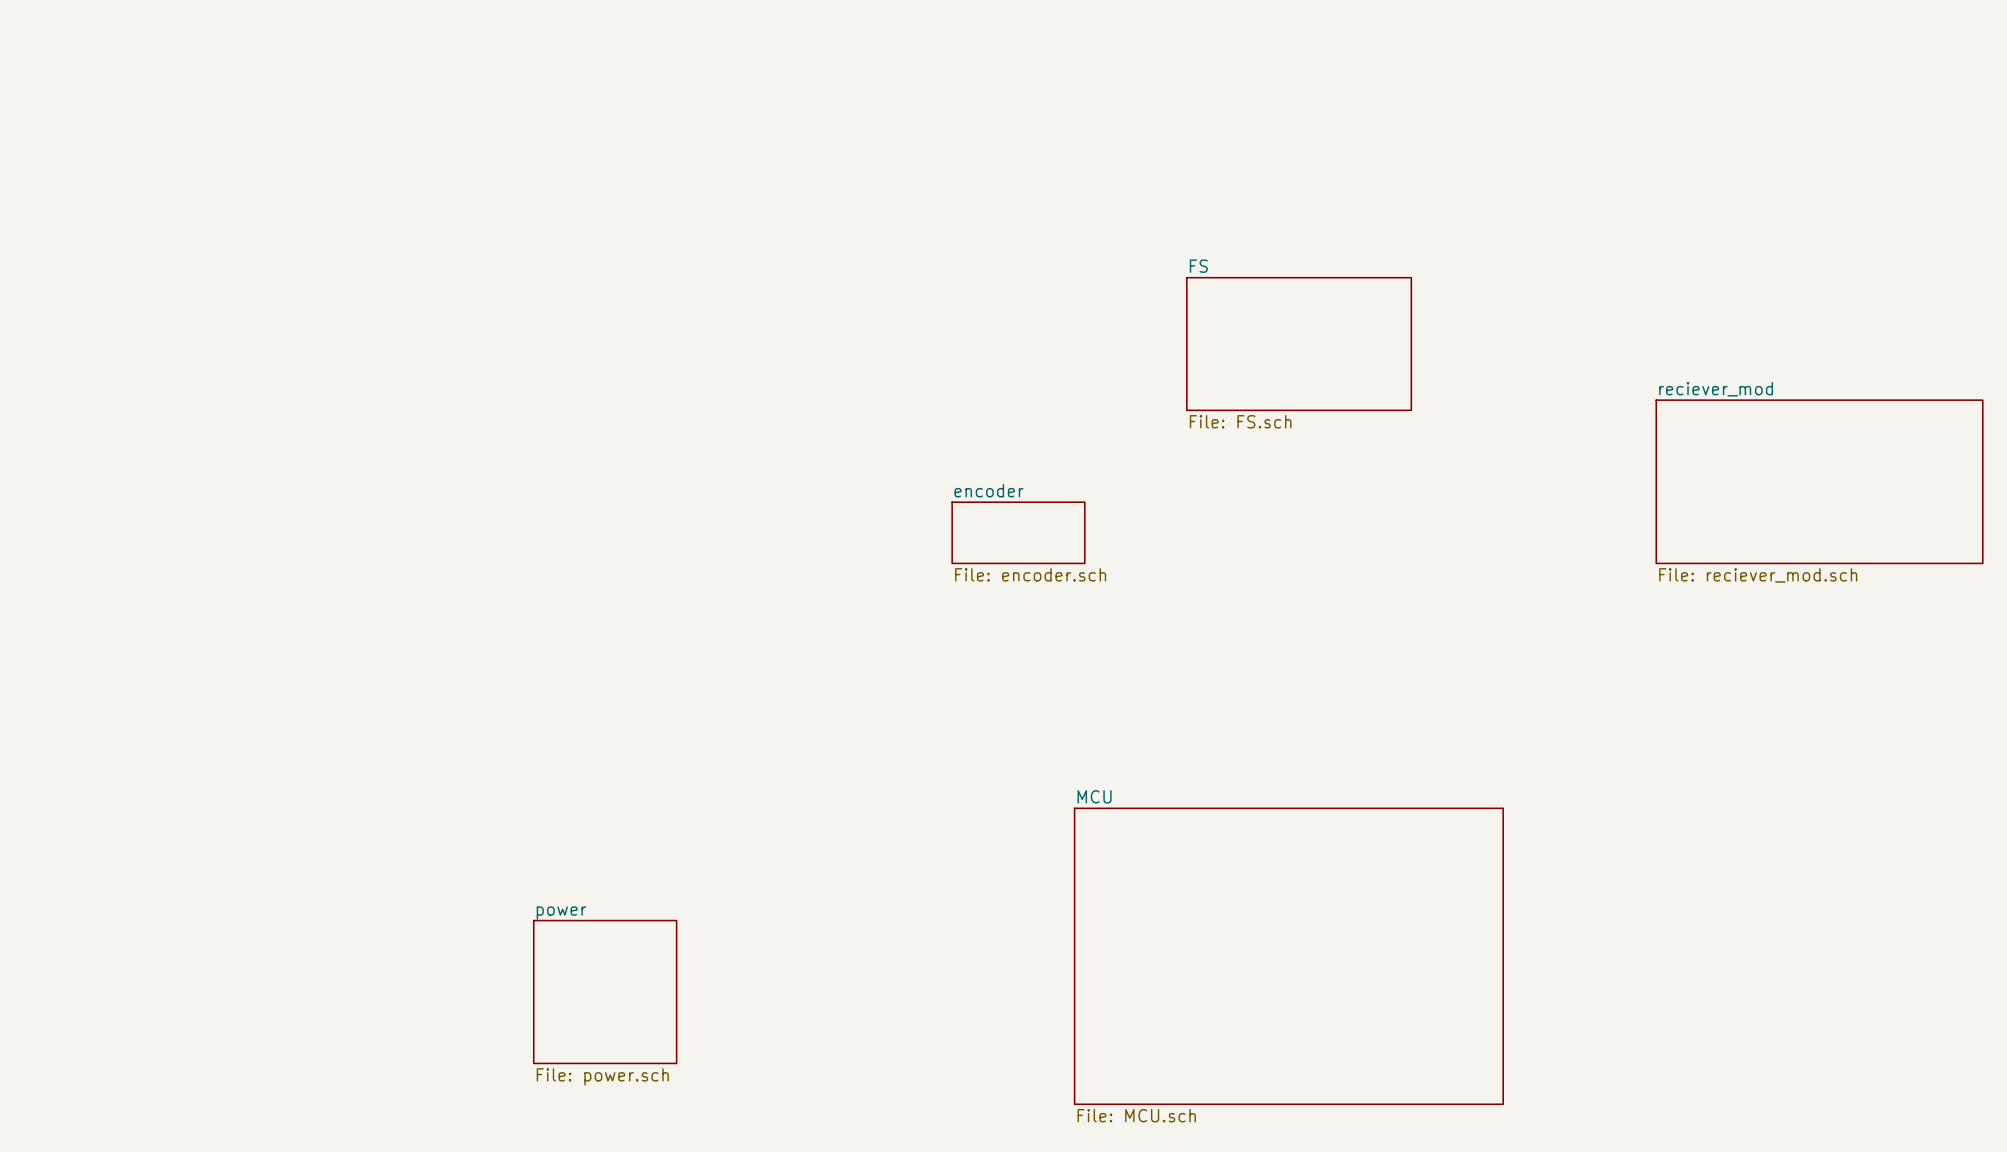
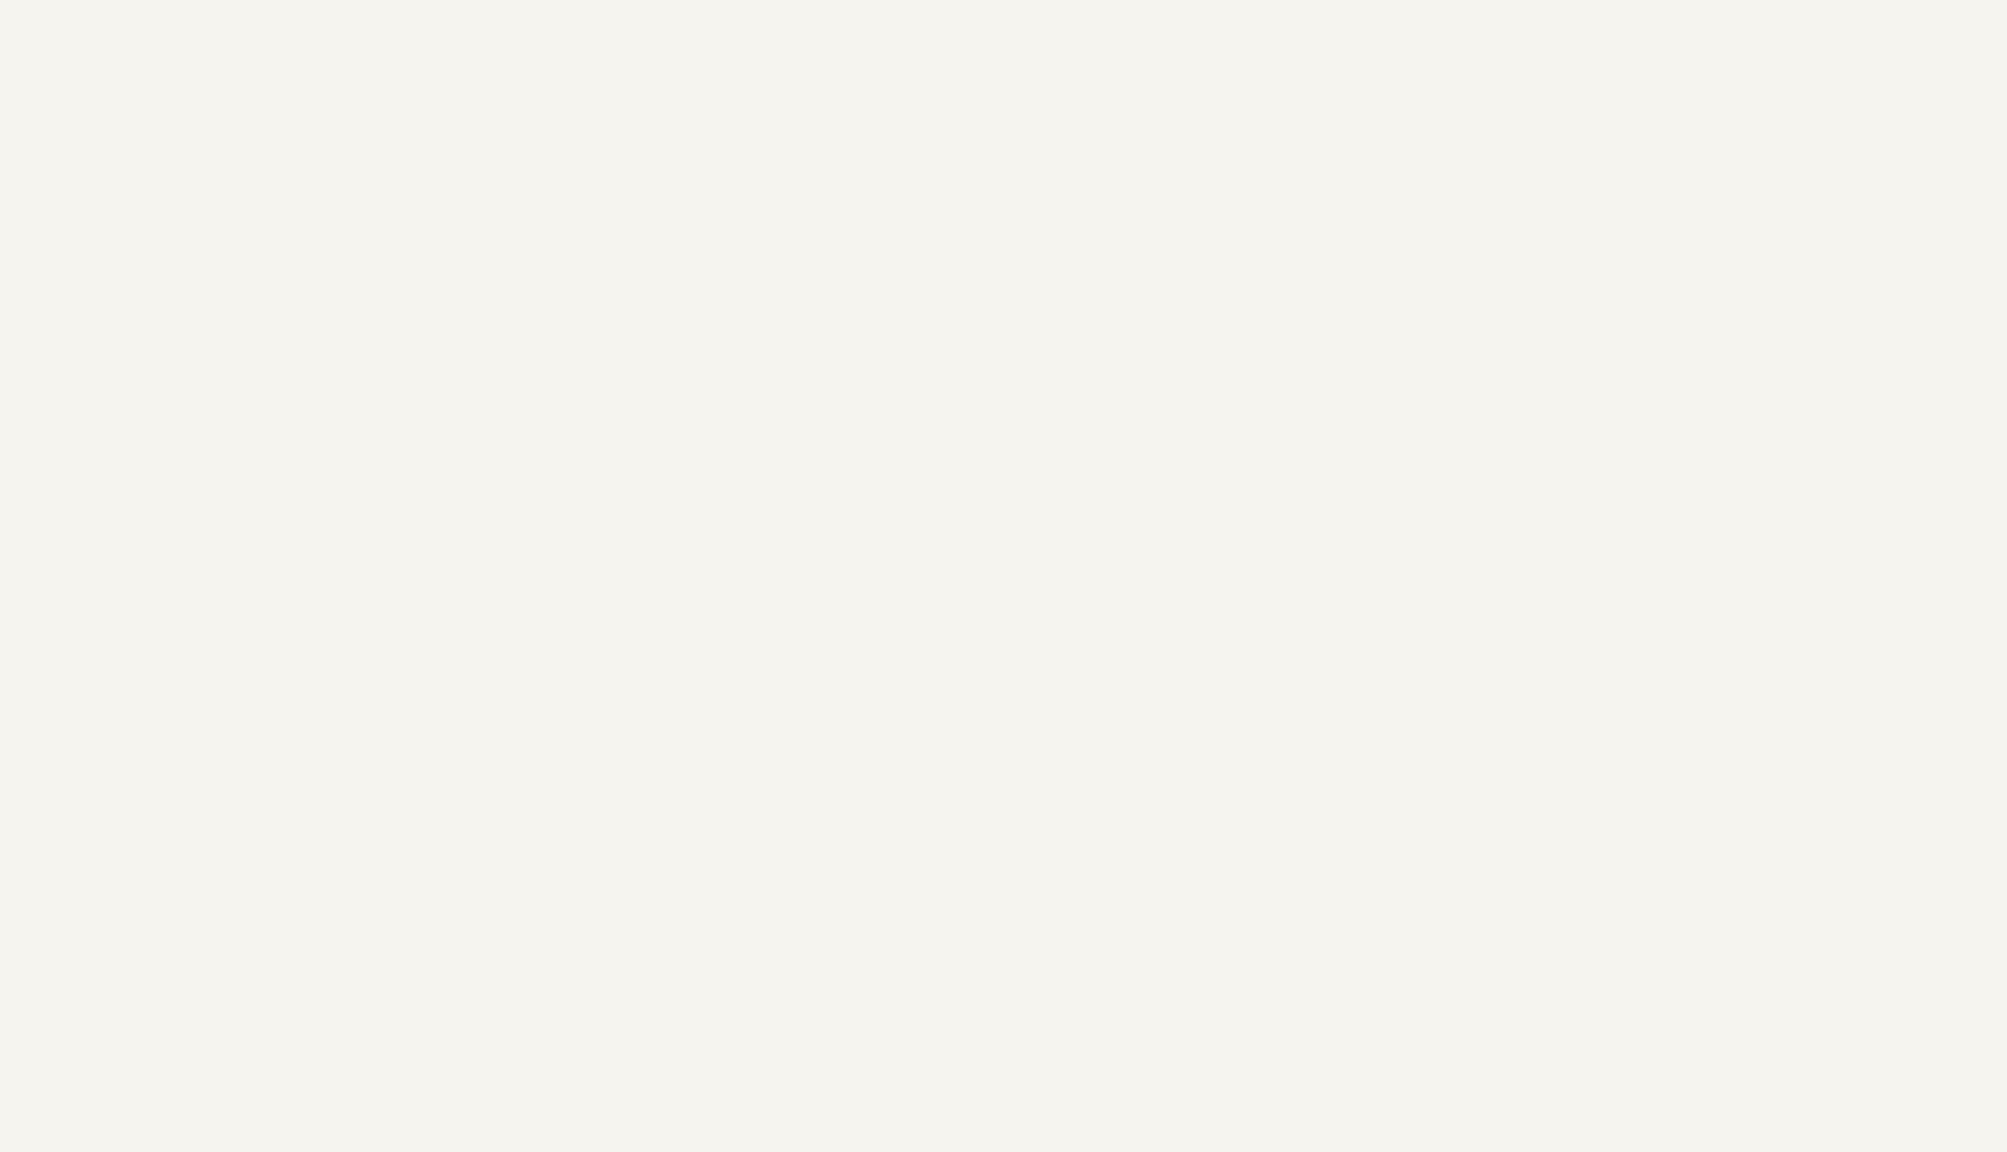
sheet FS: File: FS.sch (1299, 344) -> none
sheet reciever_mod: File: reciever_mod.sch (1819, 481) -> none
sheet encoder: File: encoder.sch (1018, 532) -> none
sheet MCU: File: MCU.sch (1288, 956) -> none
sheet power: File: power.sch (605, 992) -> none

